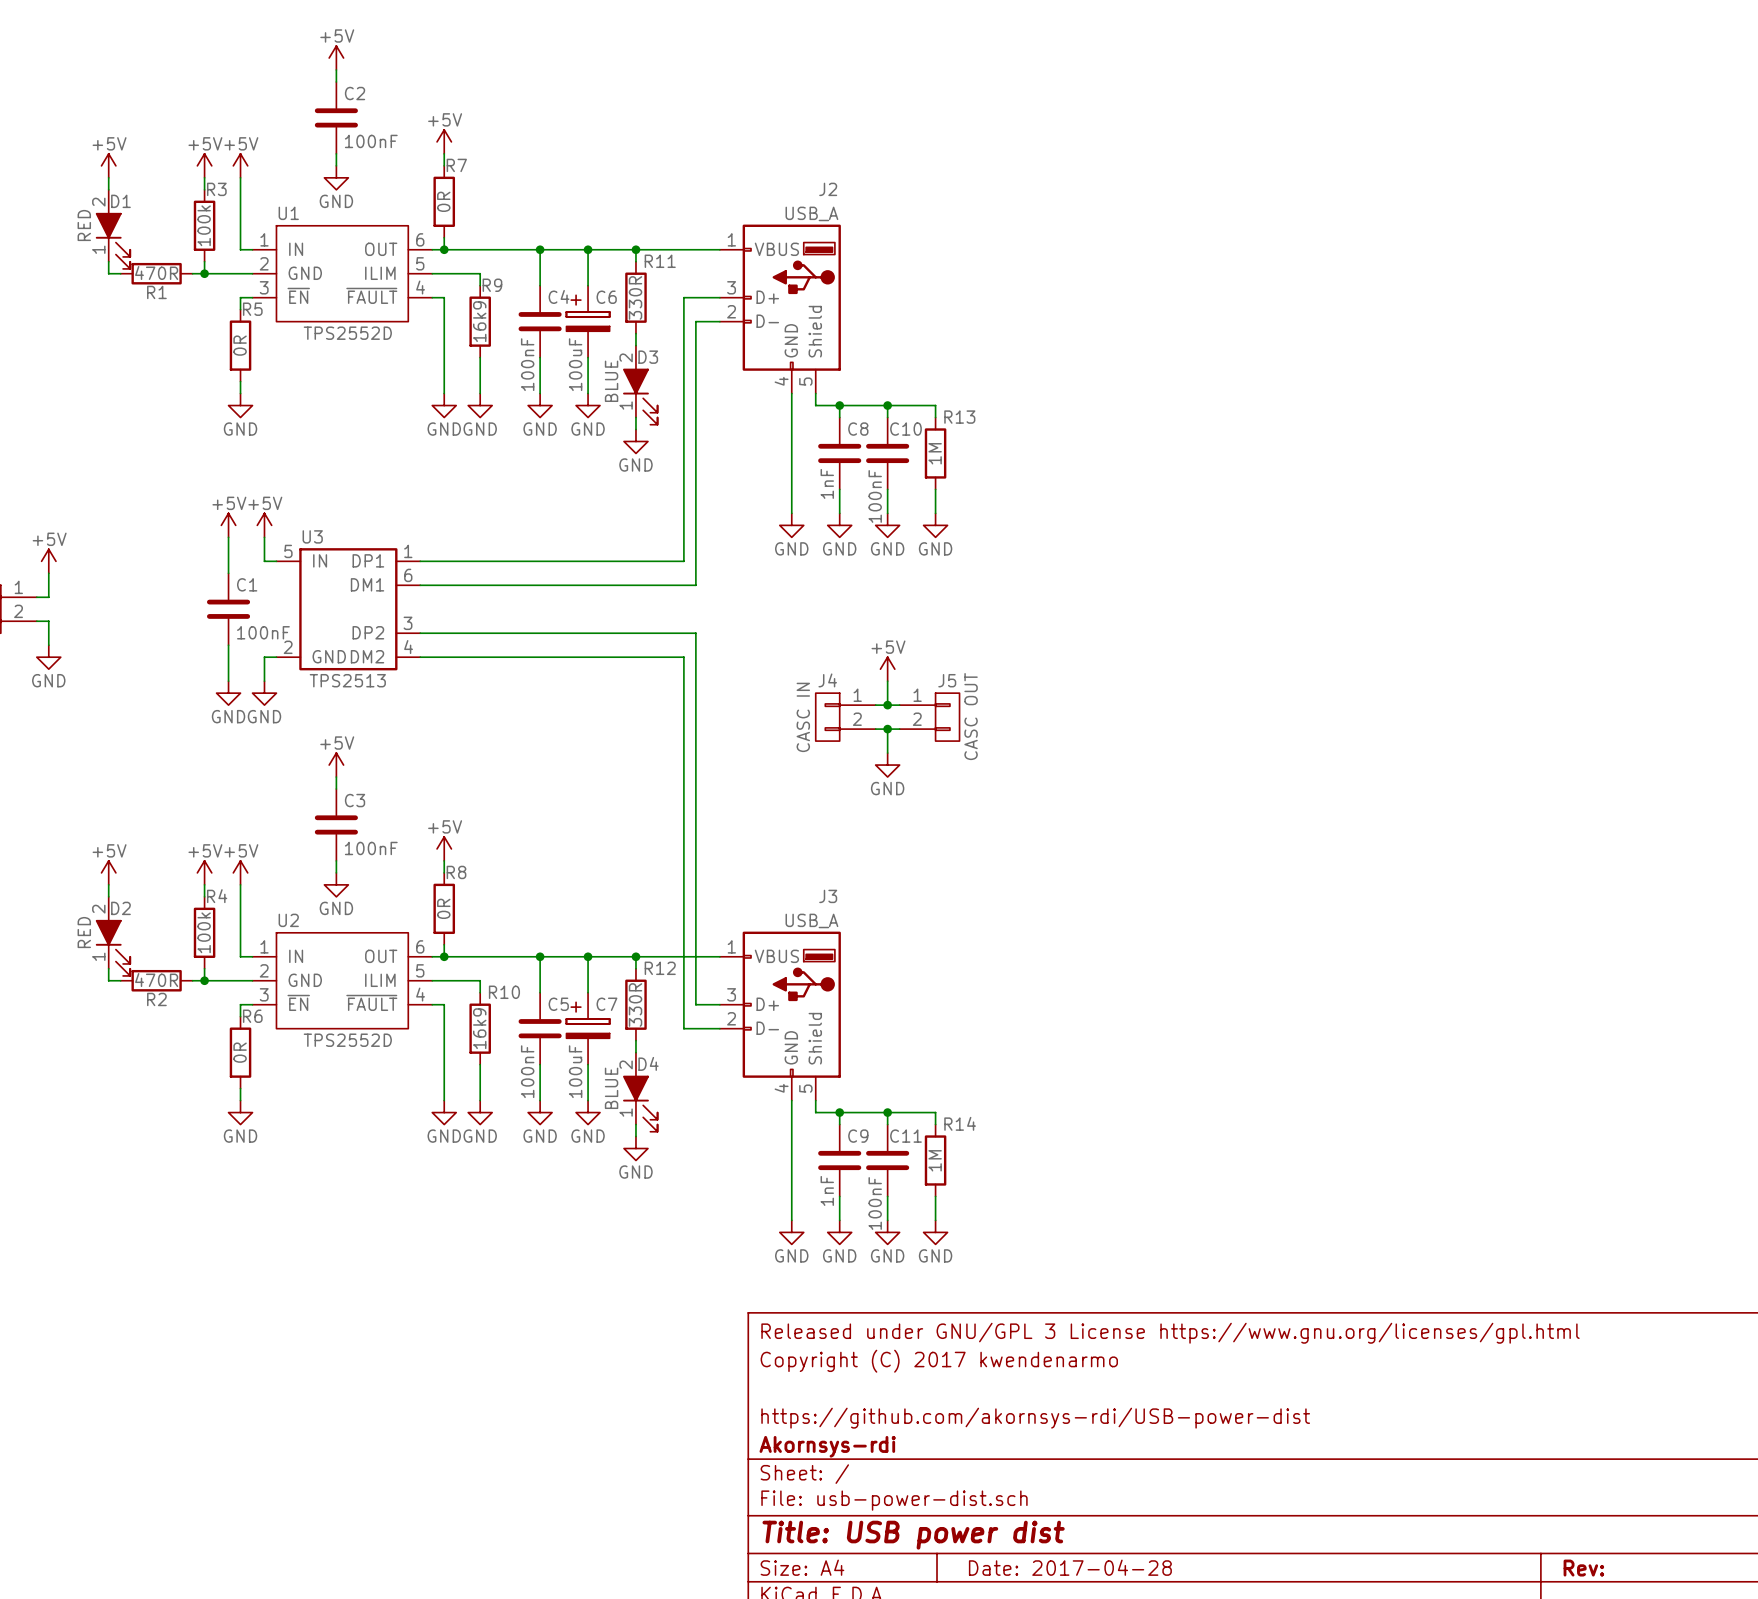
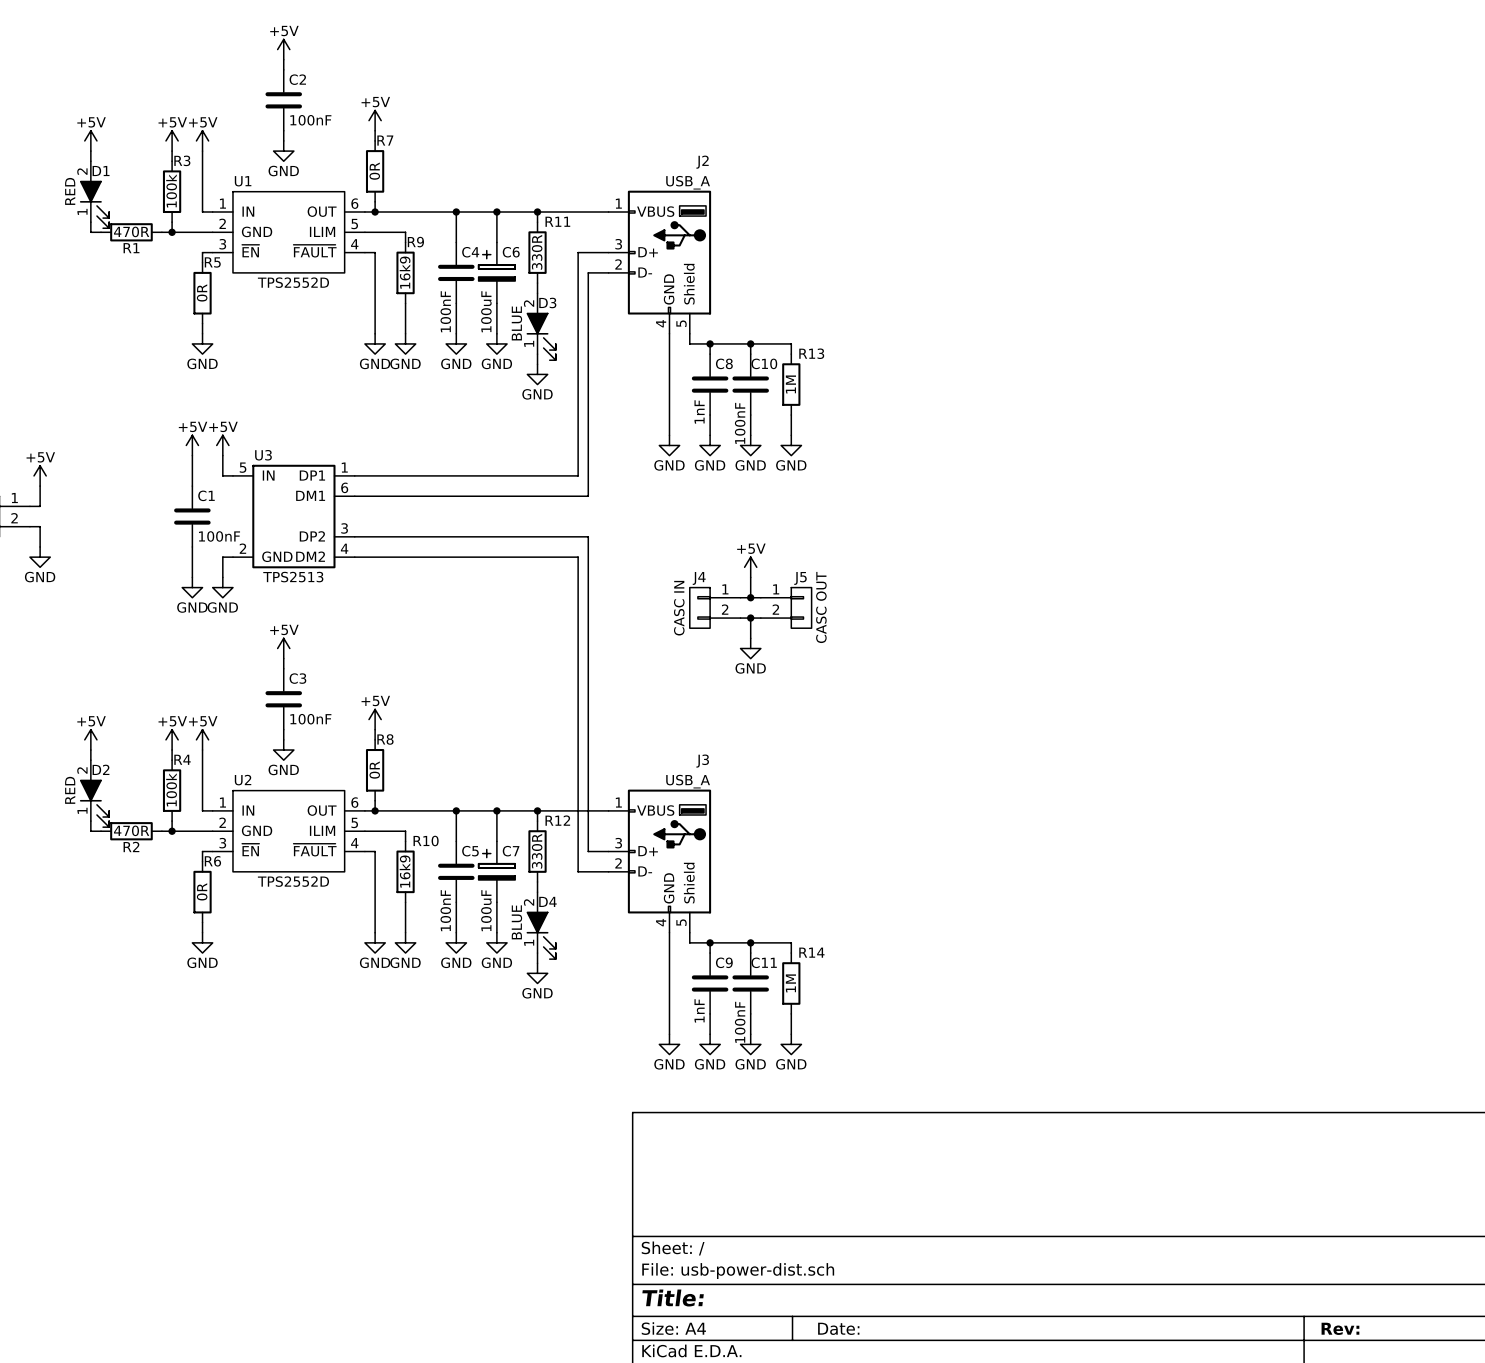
title block: Released under GNU/GPL 3 License https://www.gnu.org/licenses/gpl.html (1170, 1333) -> none
title block: Copyright (C) 2017 kwendenarmo (939, 1361) -> none
title block: https://github.com/akornsys-rdi/USB-power-dist (1035, 1418) -> none
title block: Akornsys-rdi (827, 1446) -> none
title block: Title: USB power dist (913, 1535) -> Title: (673, 1298)
title block: Date: 2017-04-28 (1070, 1567) -> Date: (838, 1328)

